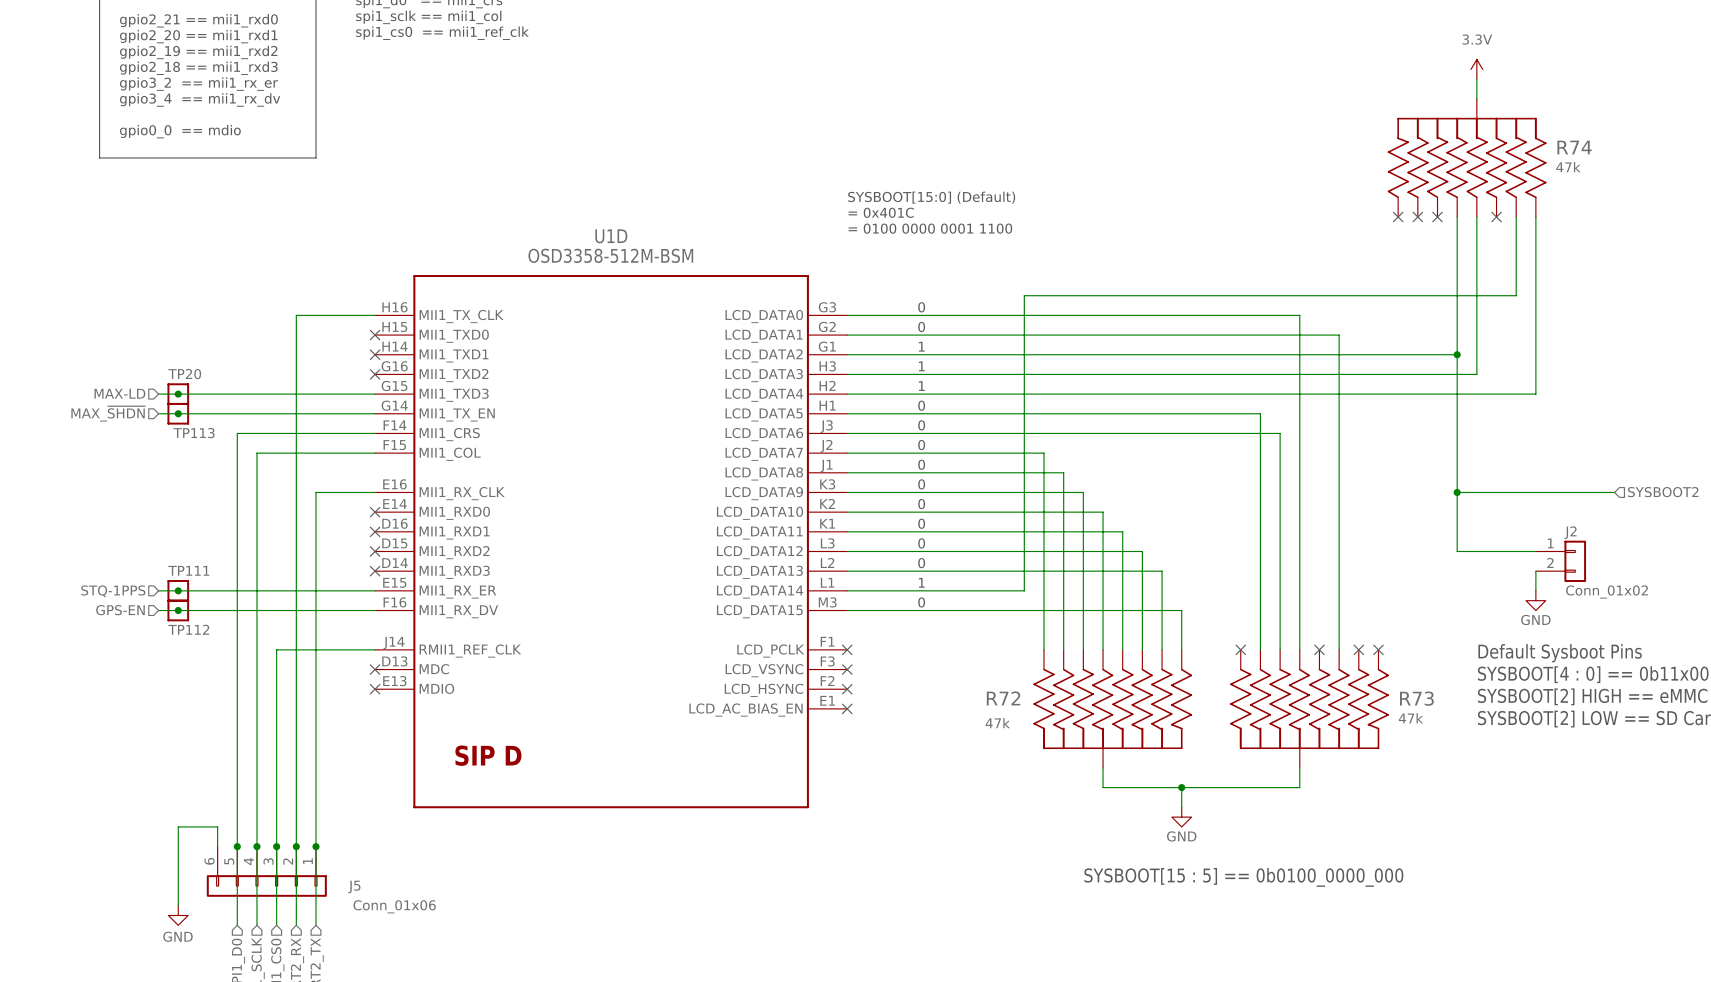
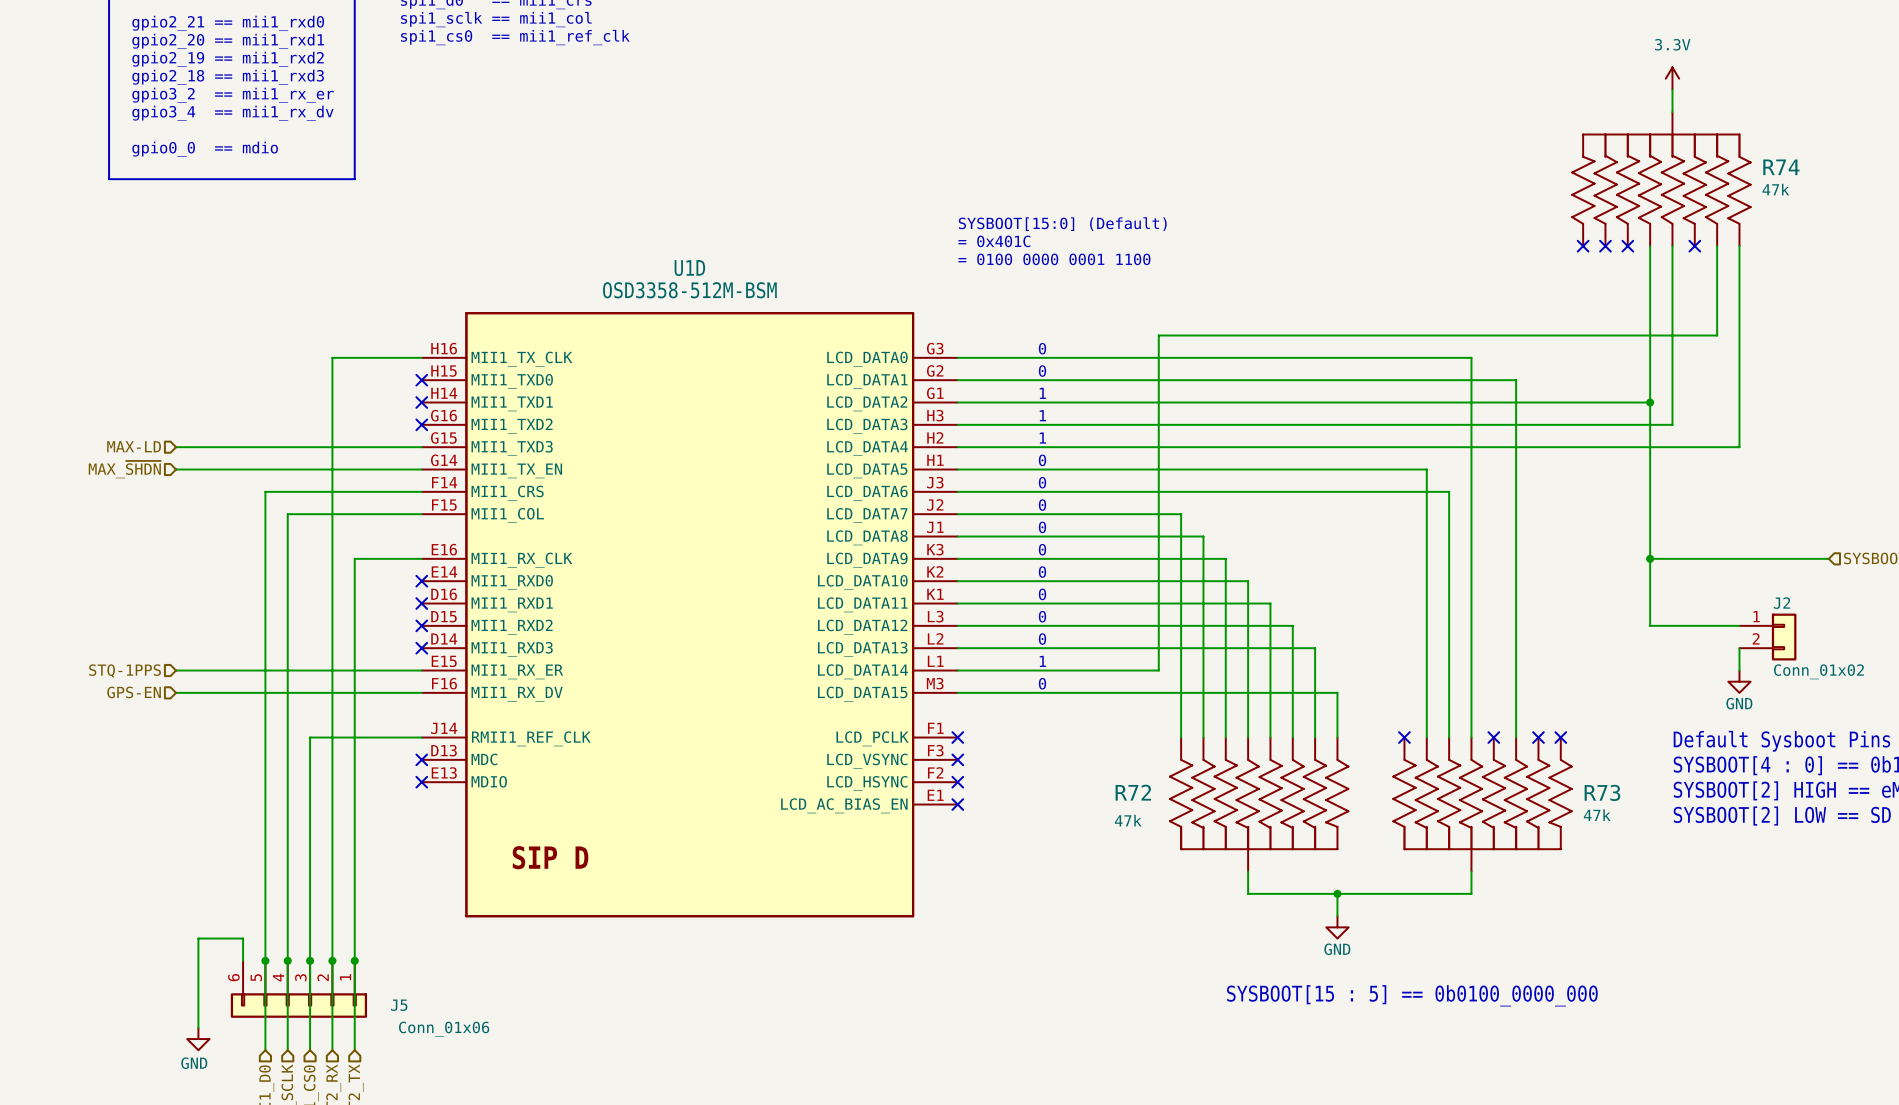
junction: (178, 394) -> none
TP20: (178, 394) -> none
junction: (178, 413) -> none
TP113: (178, 413) -> none
junction: (178, 590) -> none
TP111: (178, 590) -> none
junction: (178, 610) -> none
TP112: (178, 610) -> none

